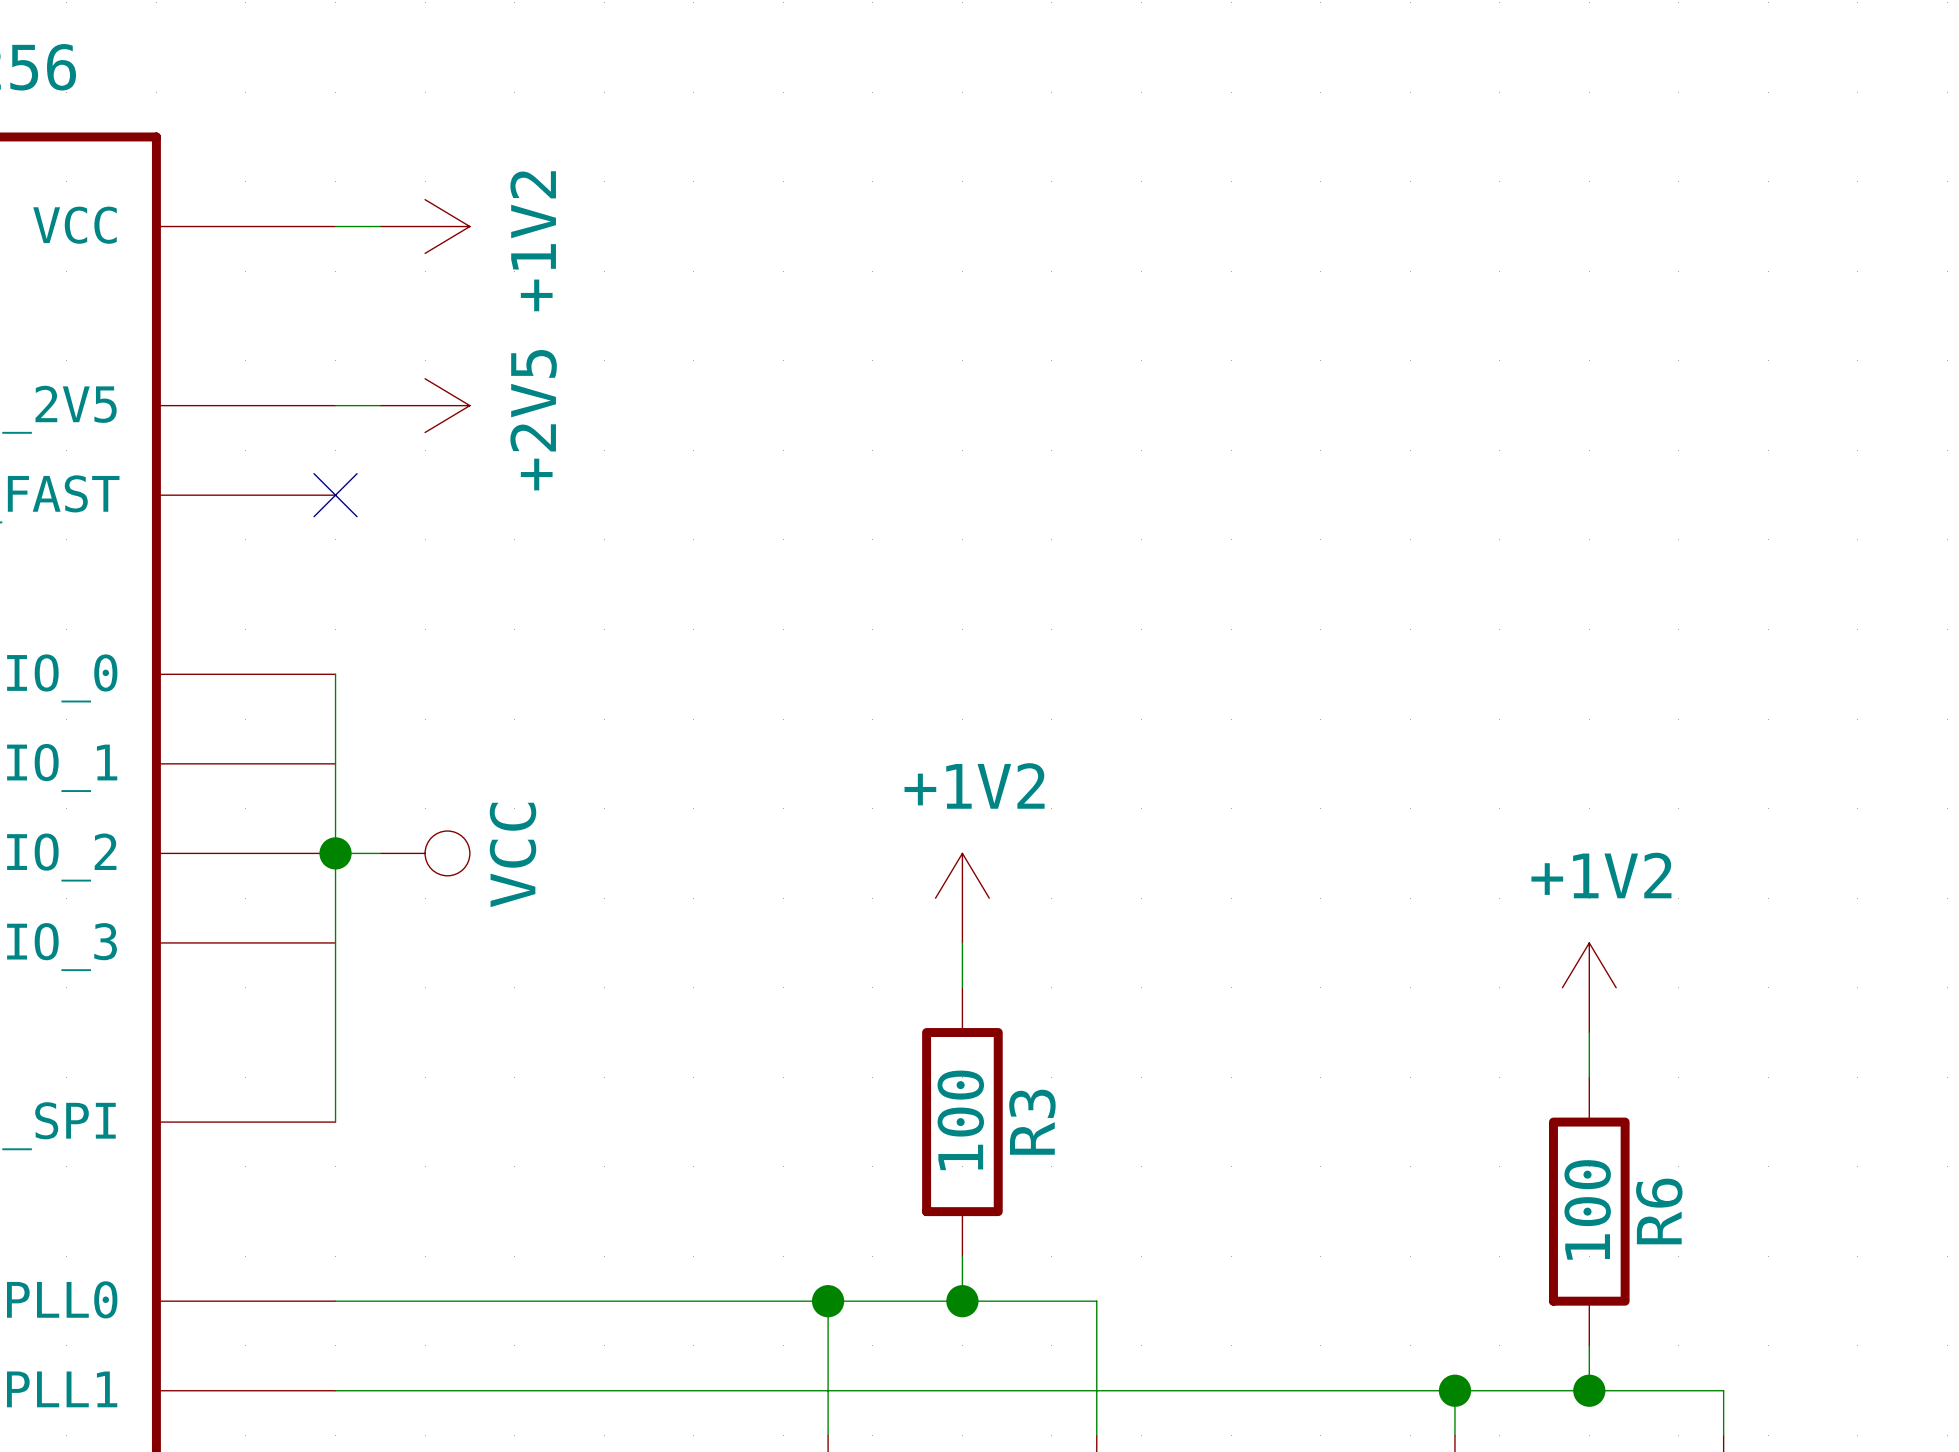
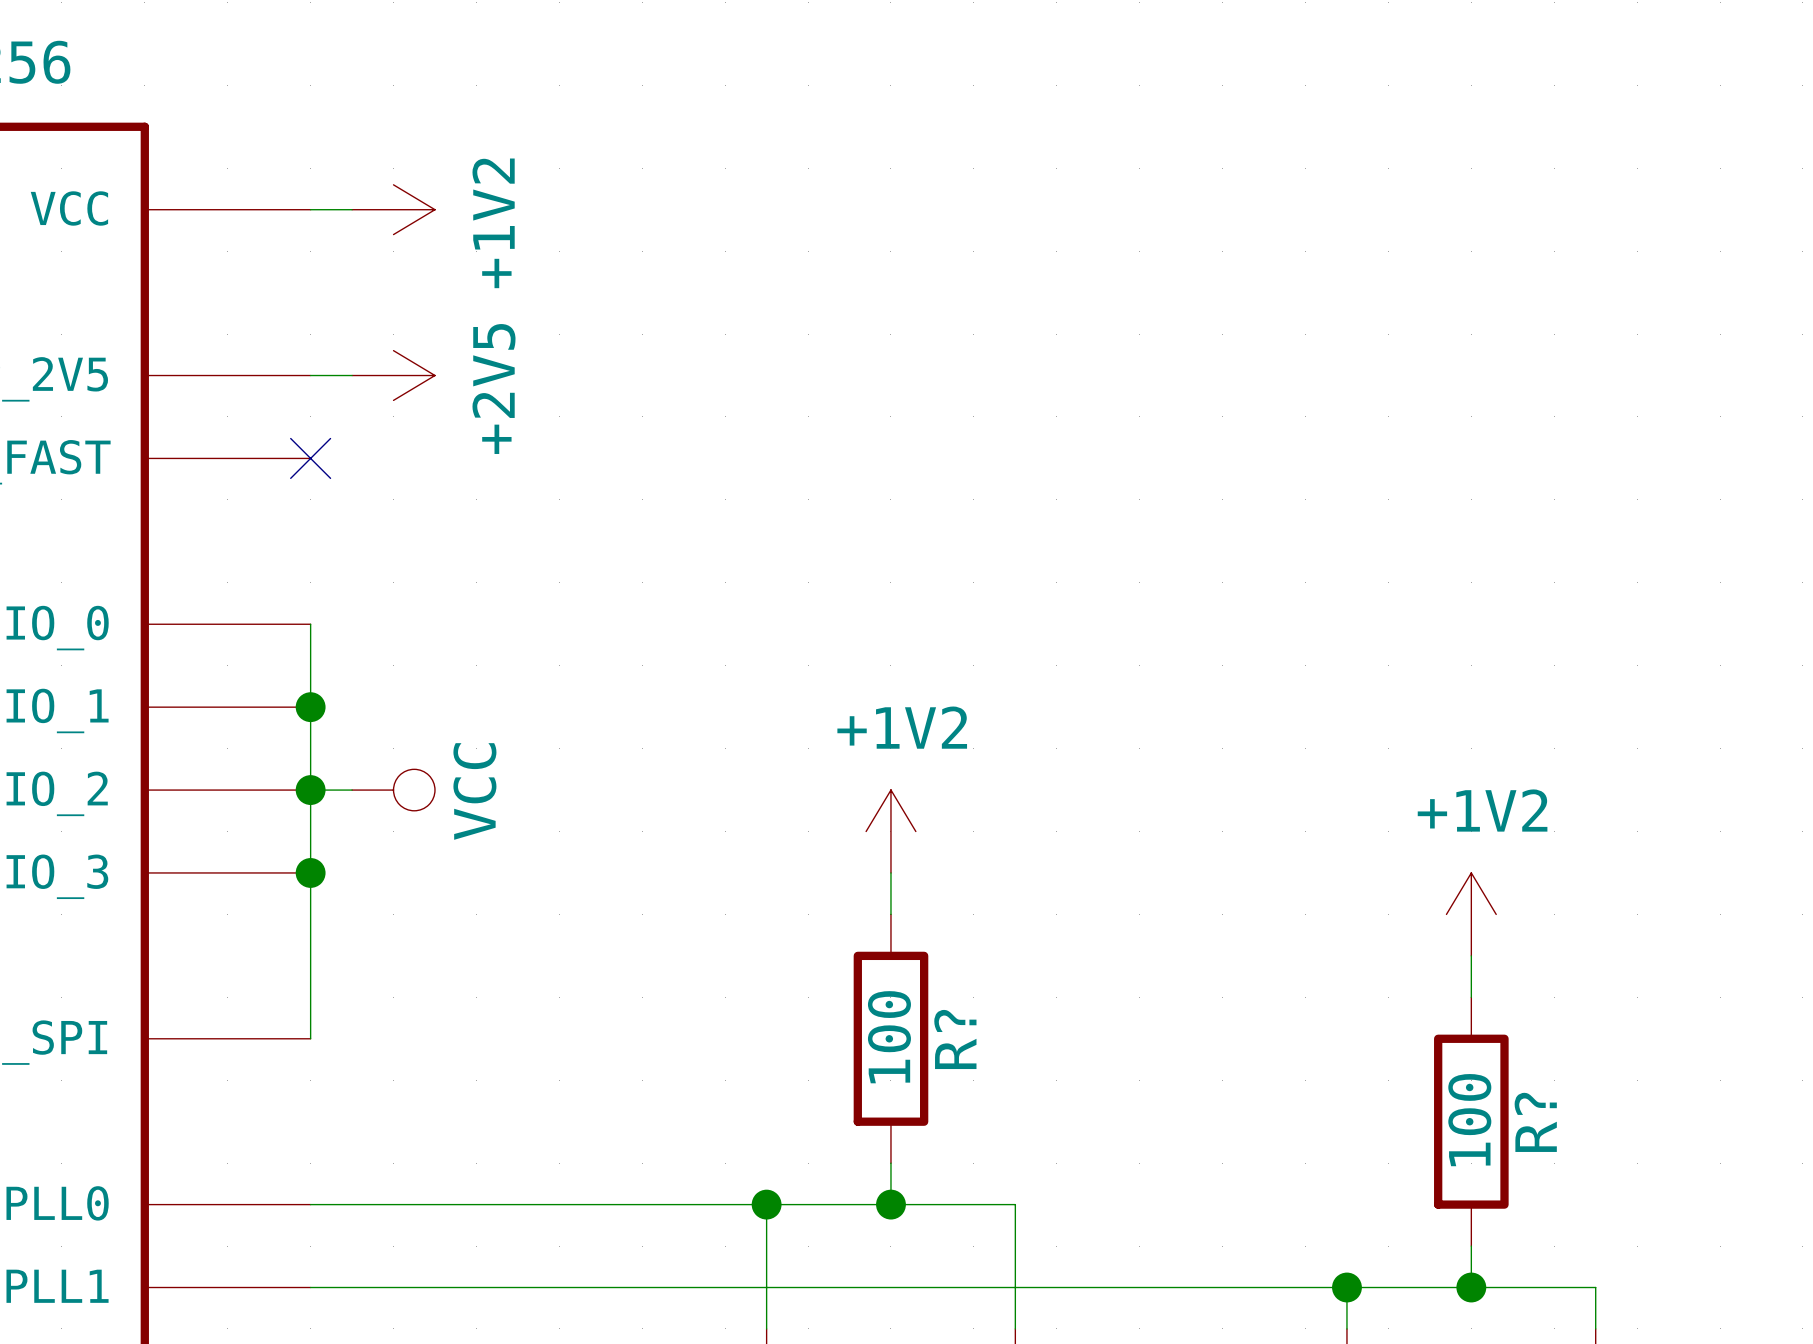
junction: none -> (310, 707)
junction: none -> (310, 872)
R3 name: R3 (1032, 1122) -> R? (955, 1039)
R6 name: R6 (1659, 1211) -> R? (1535, 1122)

